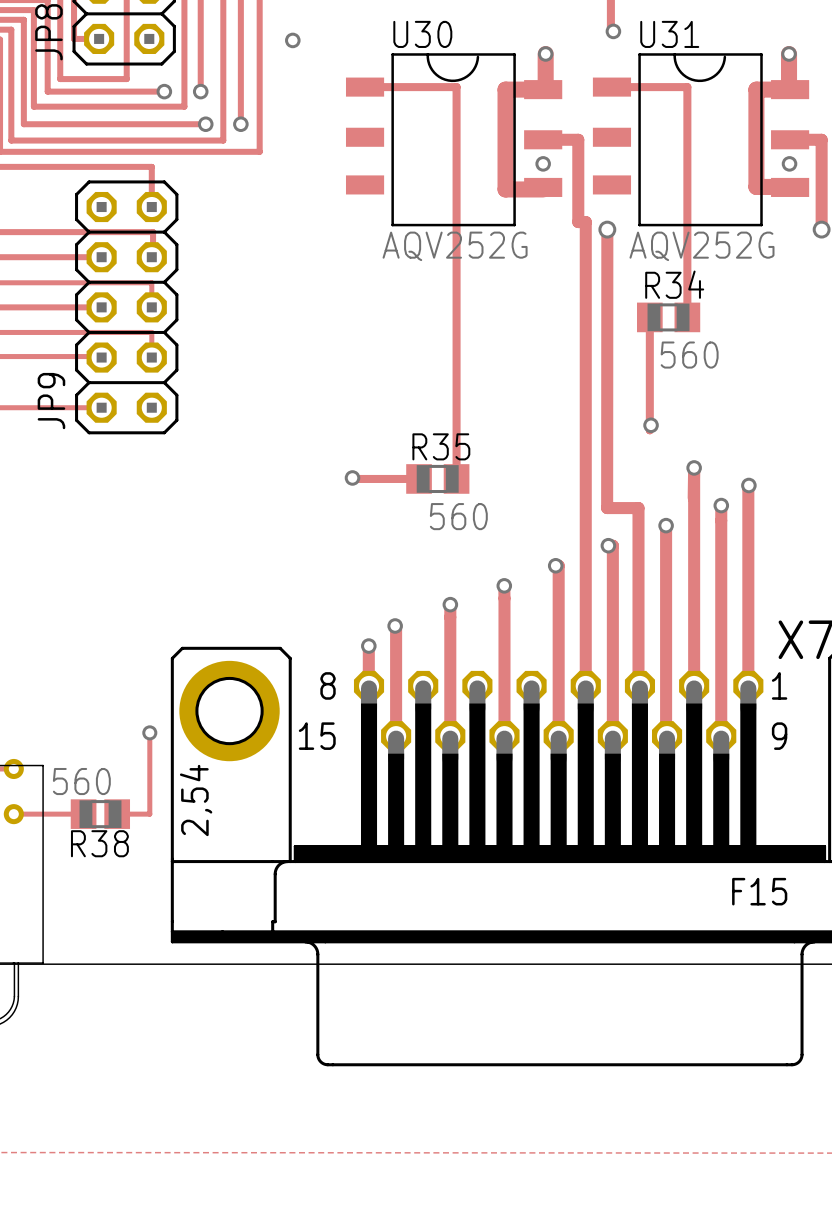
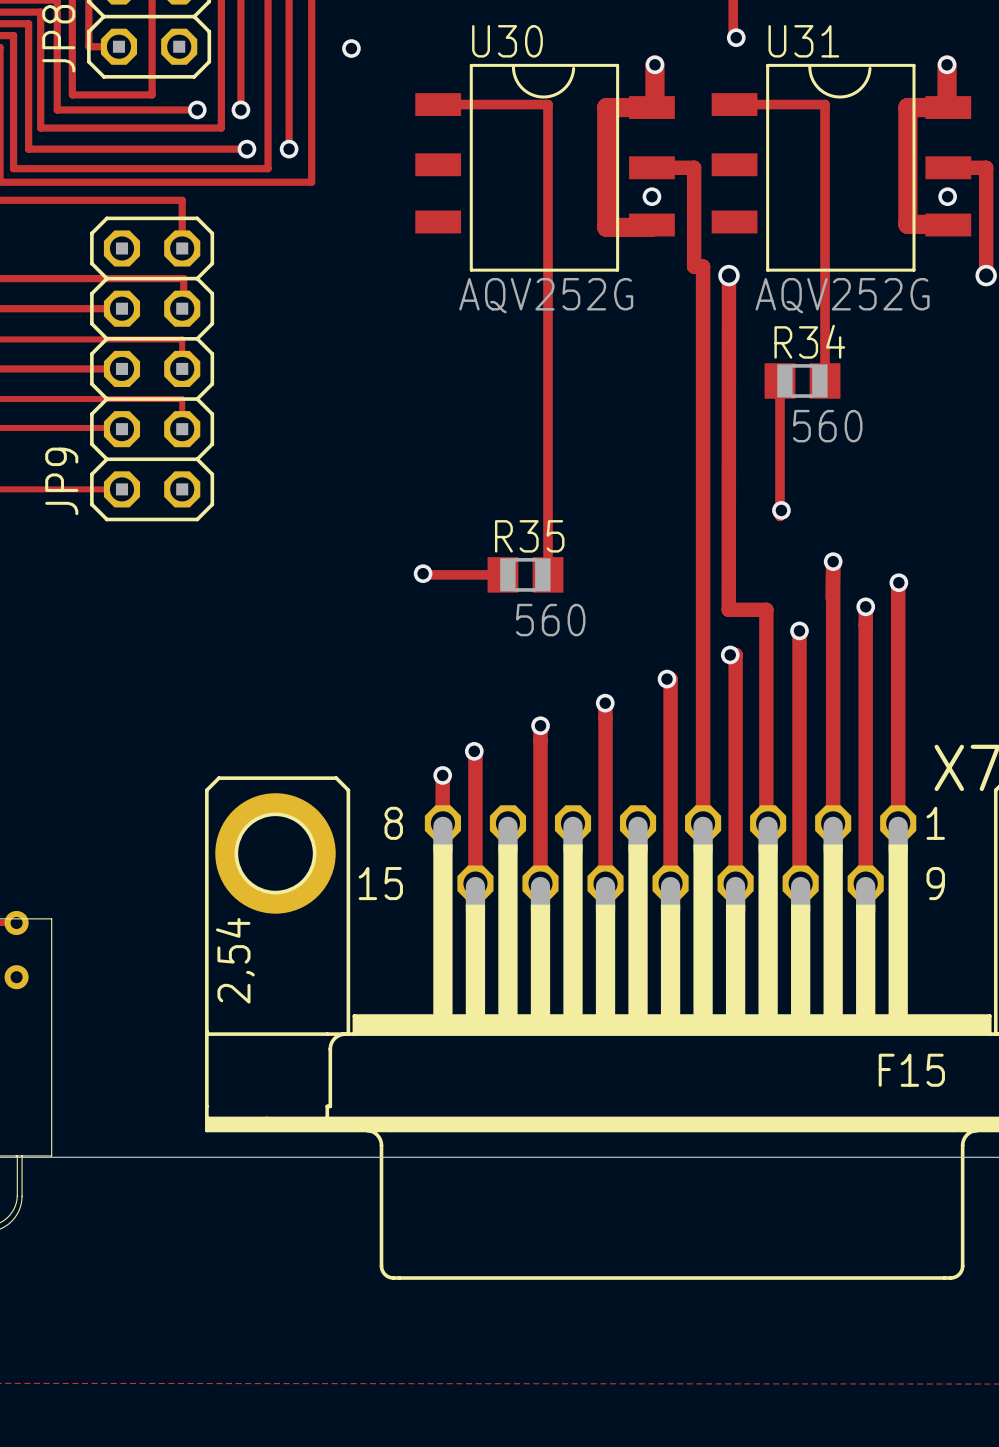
track: (149, 732) (149, 814) (117, 814) -> none
via: (149, 732) -> none
track: (13, 814) (83, 814) -> none
R38: 560 (100, 814) -> none

